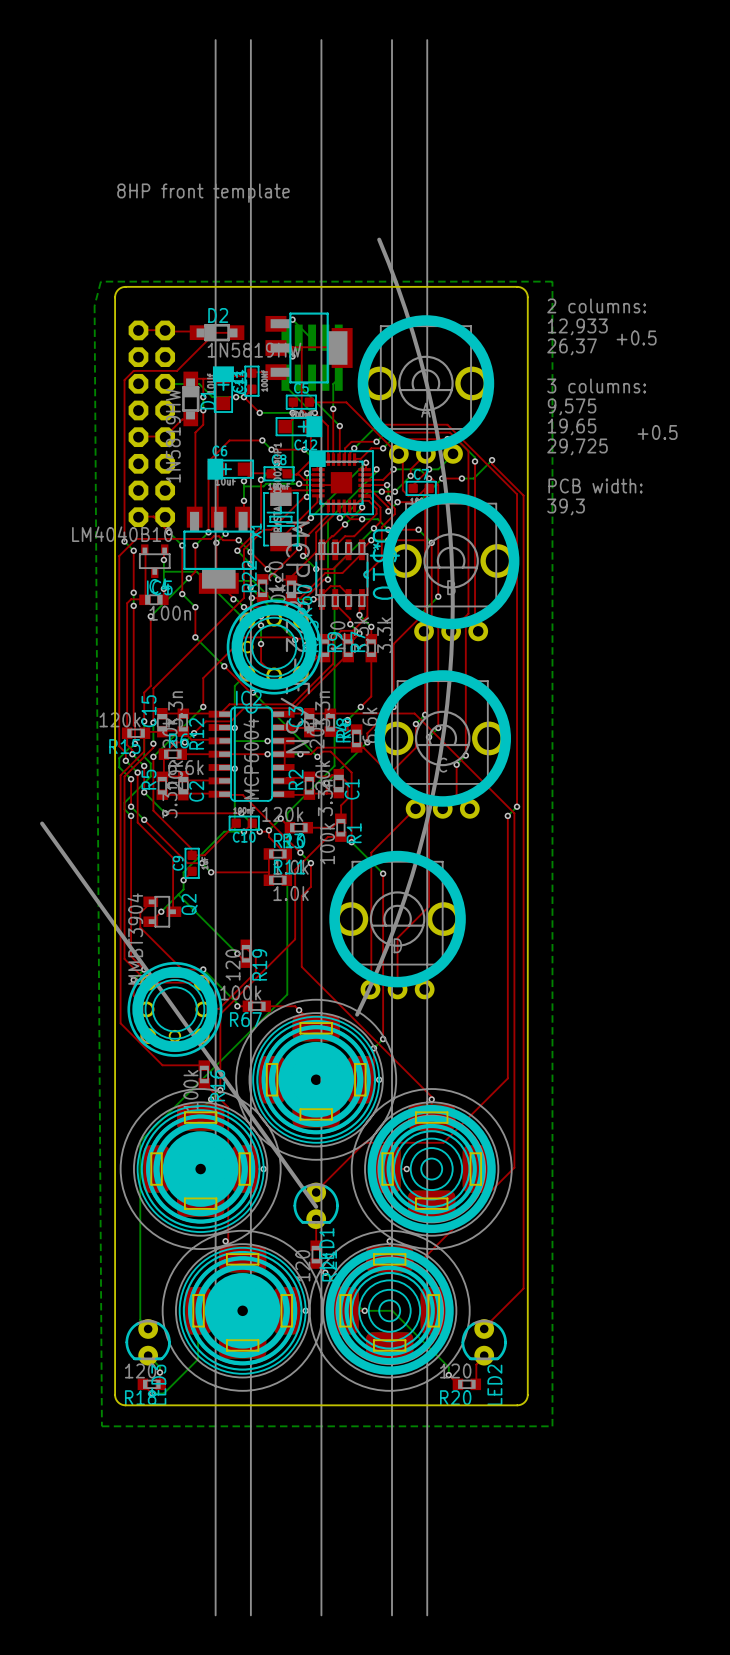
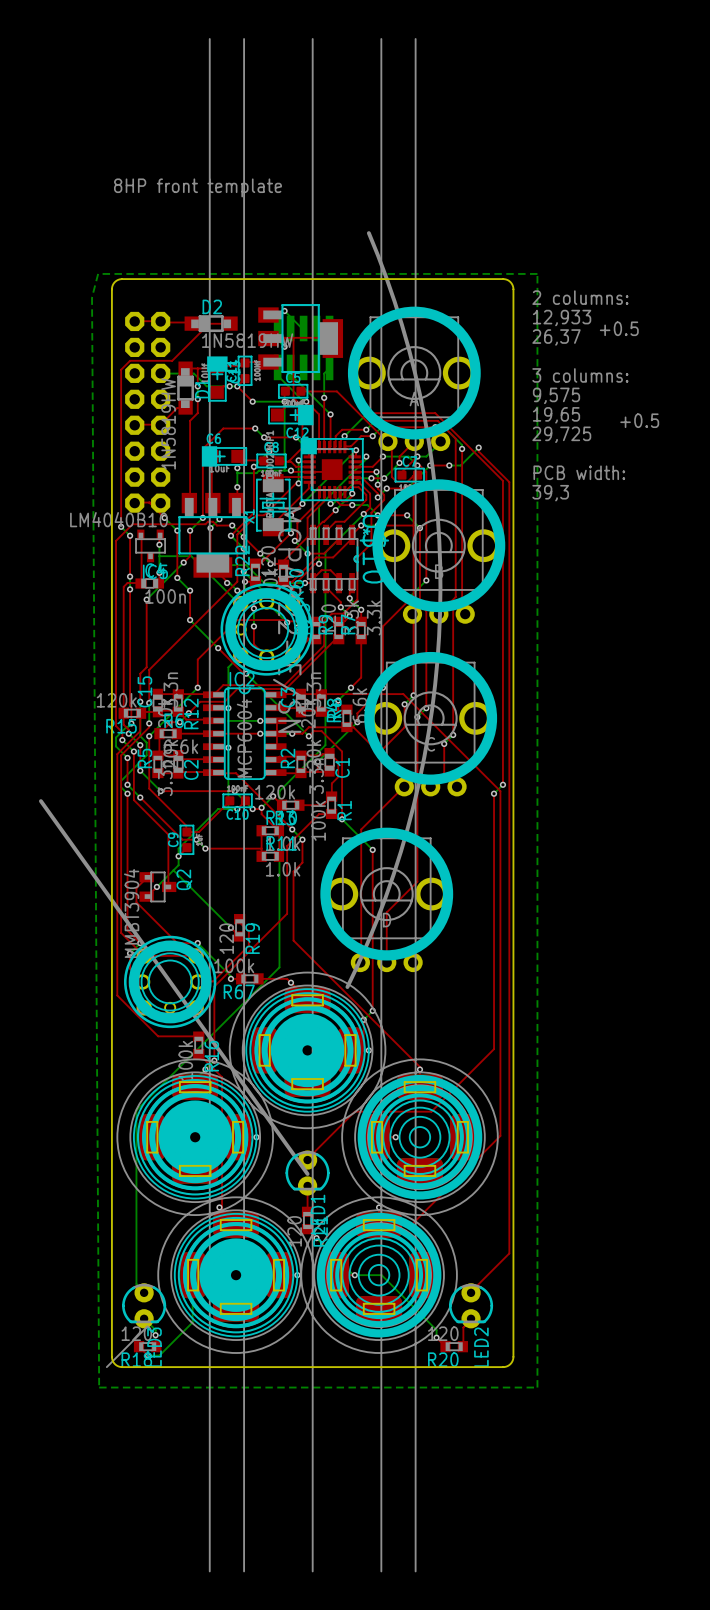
drawing shape: [114, 40, 678, 1616] -> [106, 38, 659, 1572]

